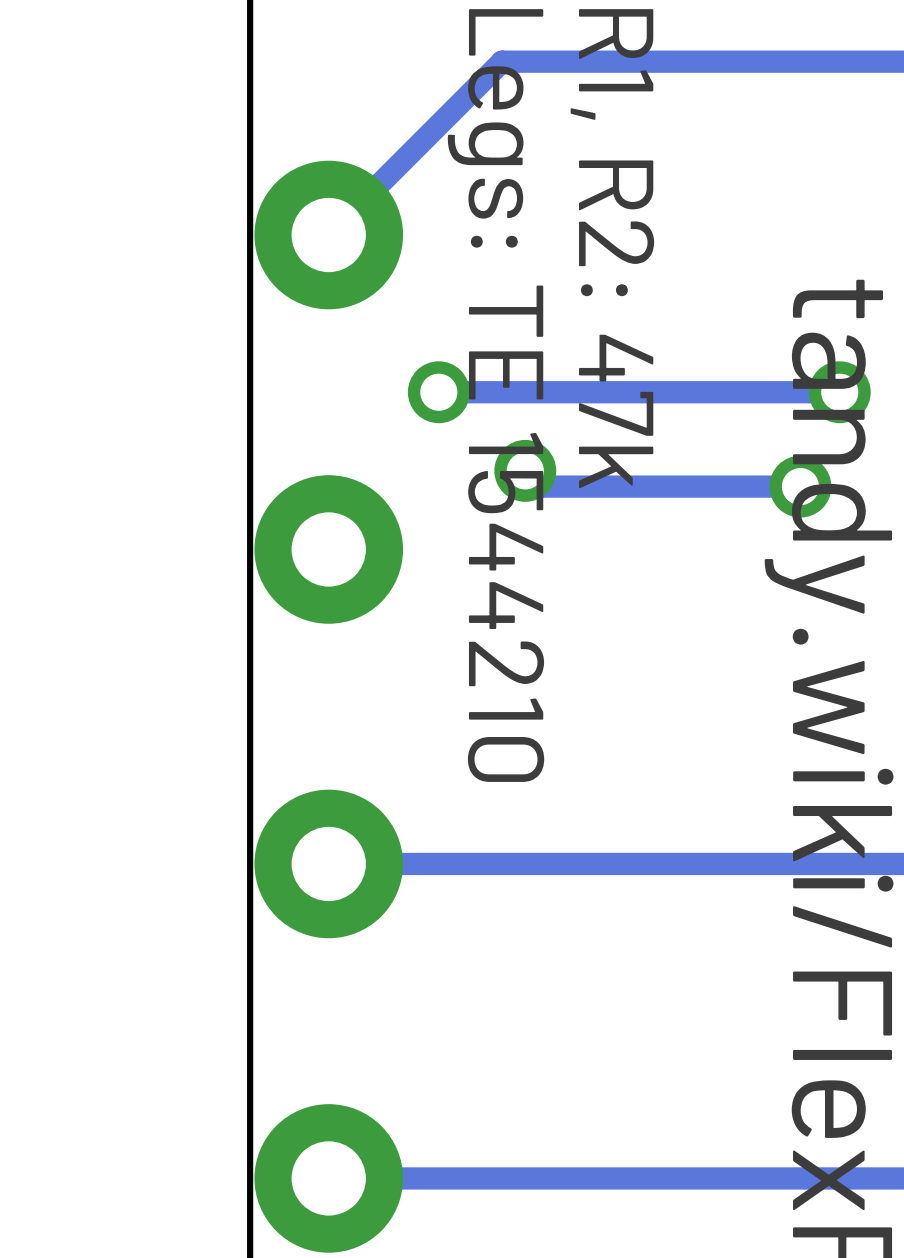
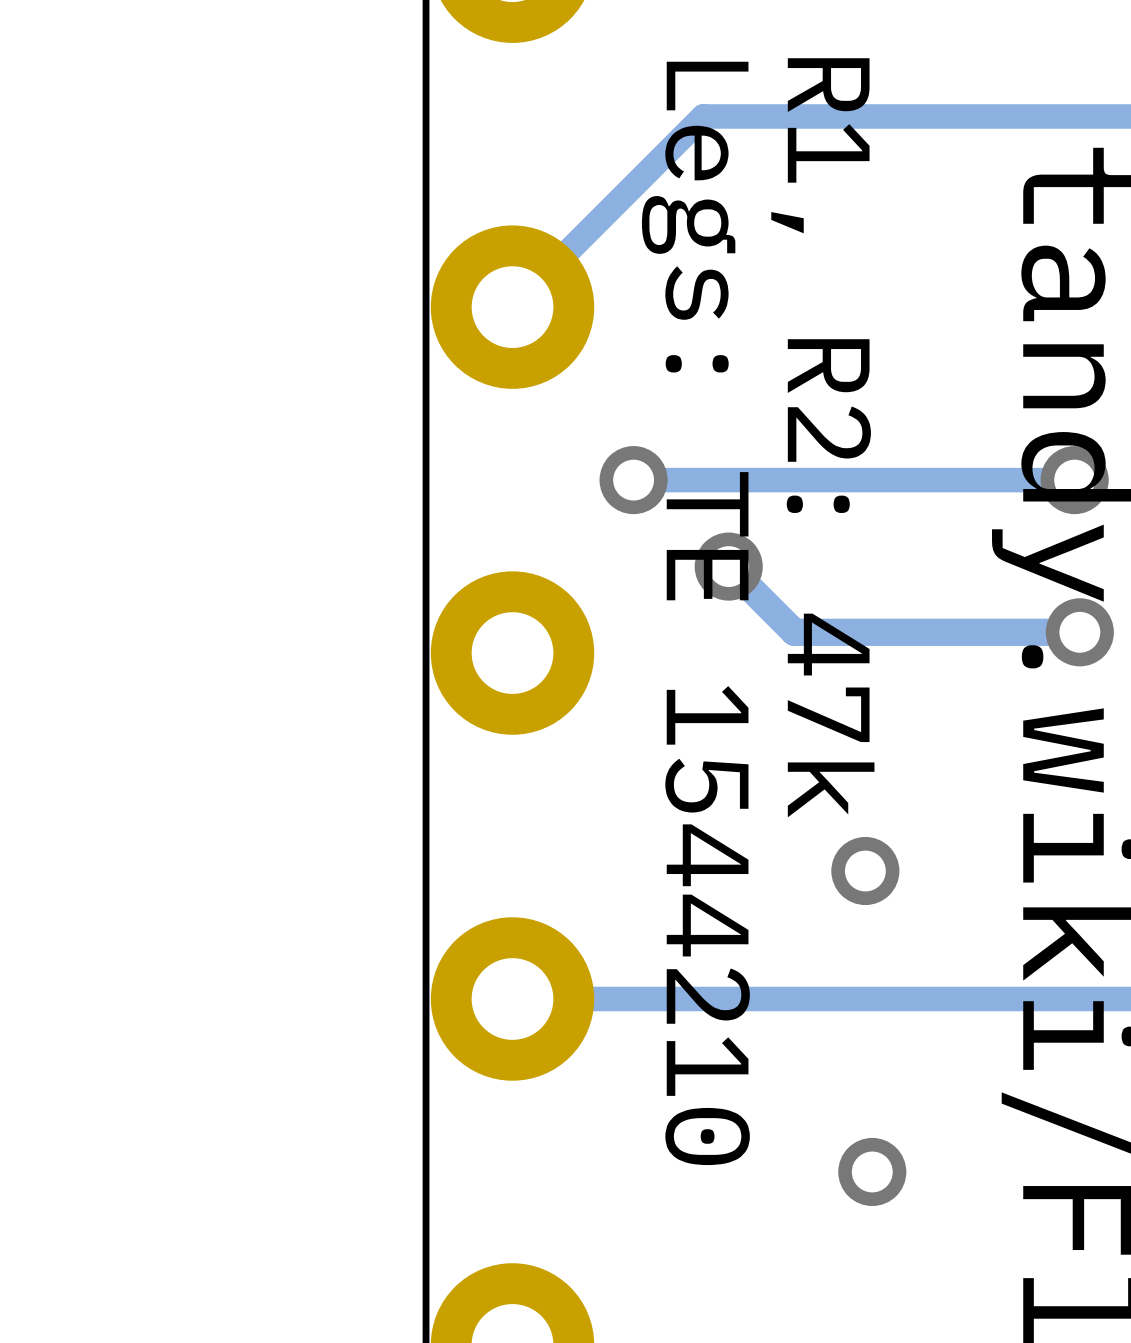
track: (800, 486) (541, 486) -> (1079, 632) (794, 632) (746, 583)
via position: (800, 486) -> (1079, 632)
via: none -> (865, 871)
via: none -> (872, 1171)

